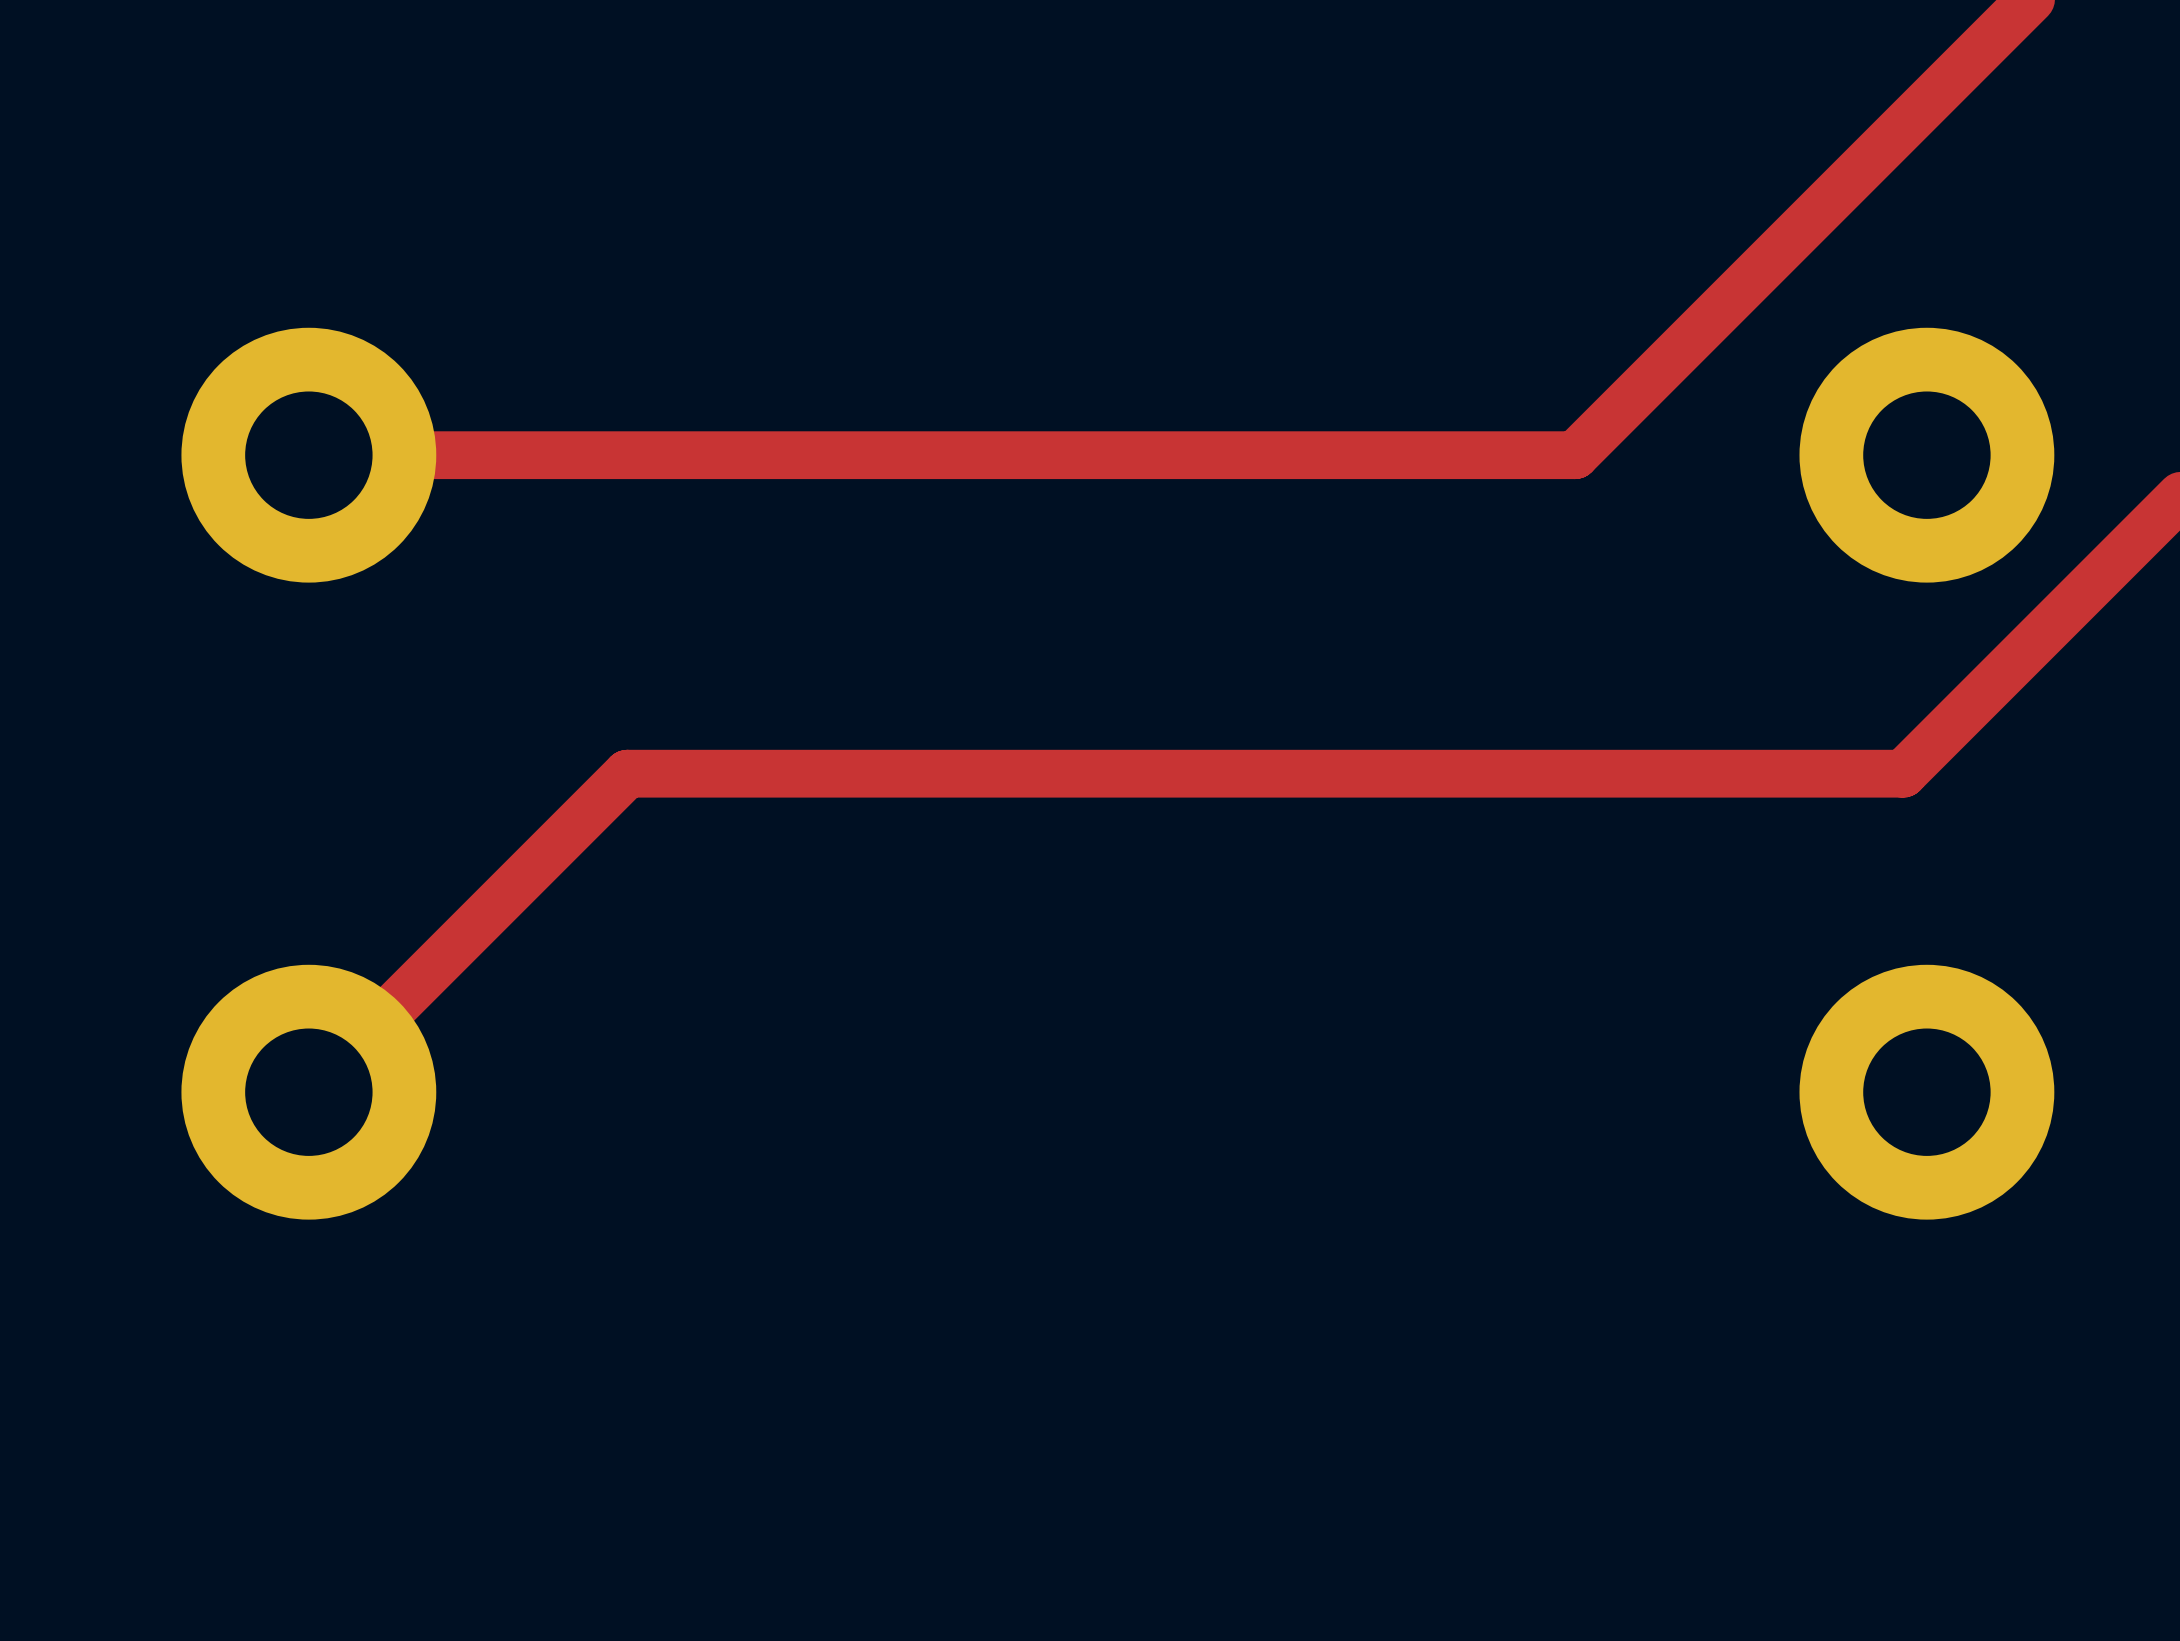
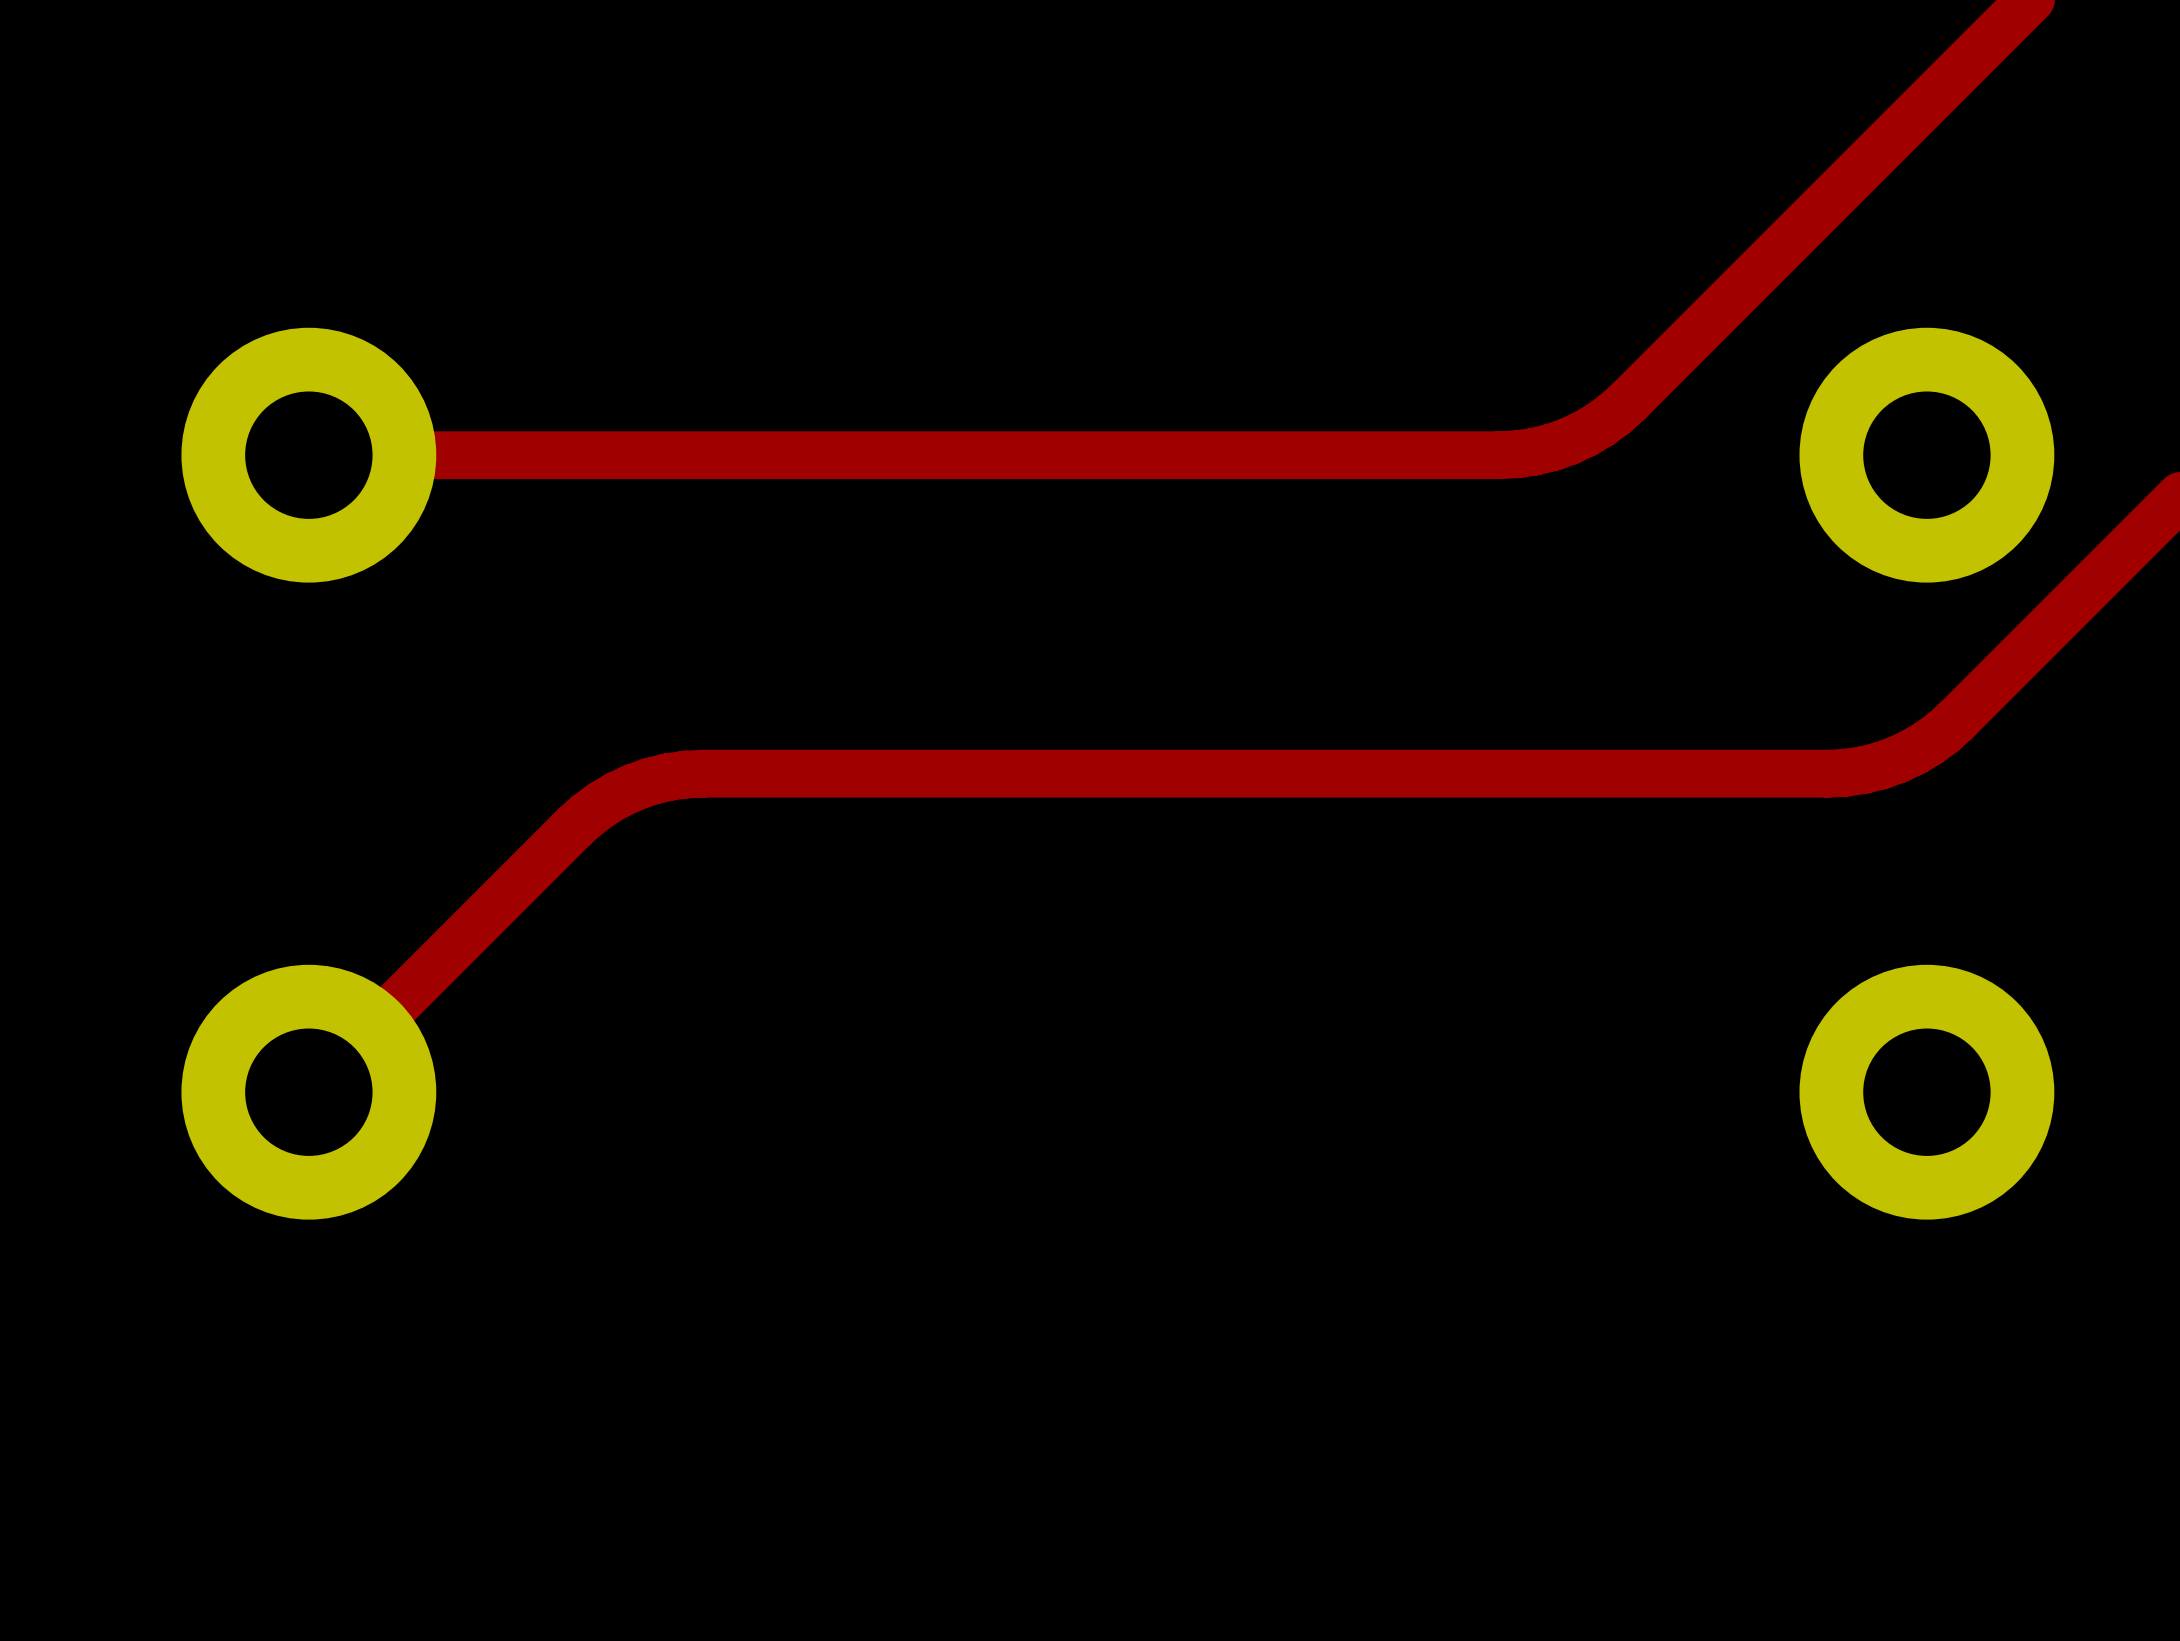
track: (1628, 401) (1574, 455) (1499, 455) -> (1628, 401) (1600, 424) (1569, 441) (1534, 451) (1499, 455)
track: (1956, 720) (1903, 773) (1827, 773) -> (1956, 720) (1928, 742) (1897, 759) (1862, 770) (1827, 773)
track: (703, 773) (627, 773) (573, 827) -> (703, 773) (667, 777) (633, 787) (601, 804) (573, 827)

